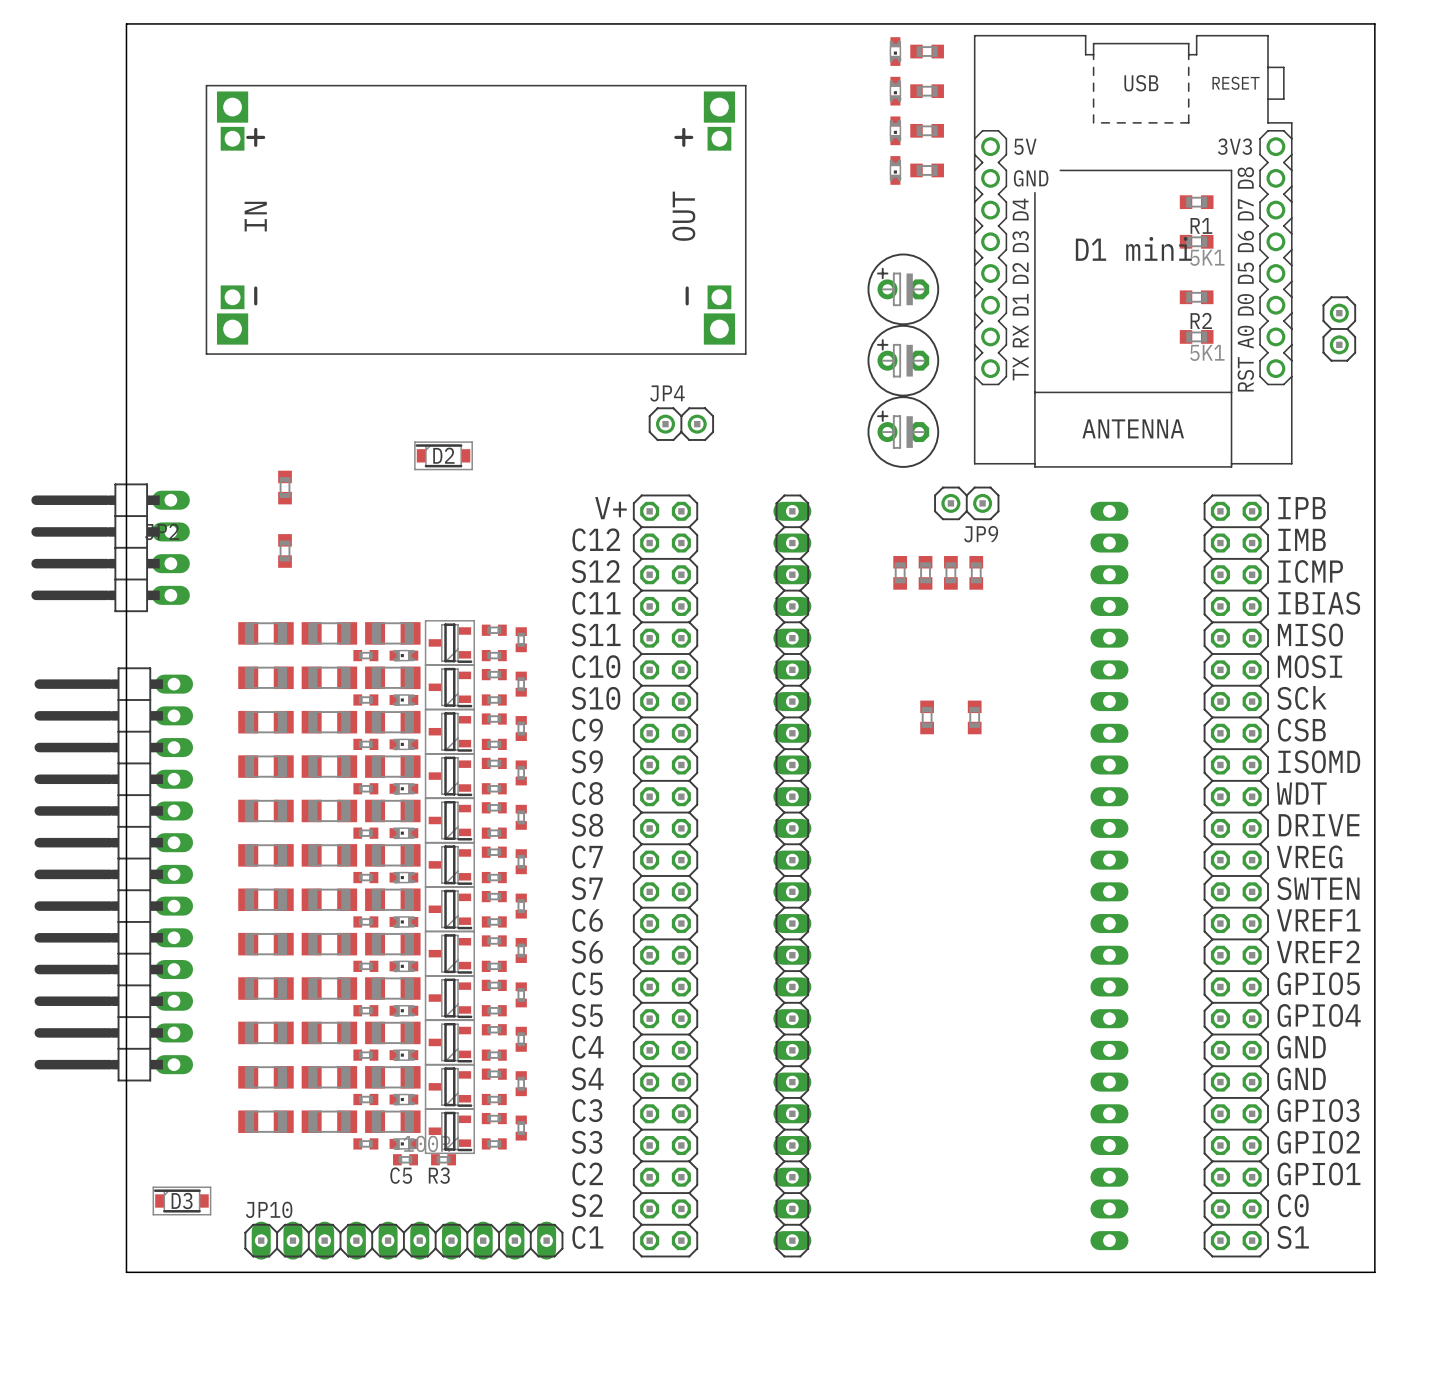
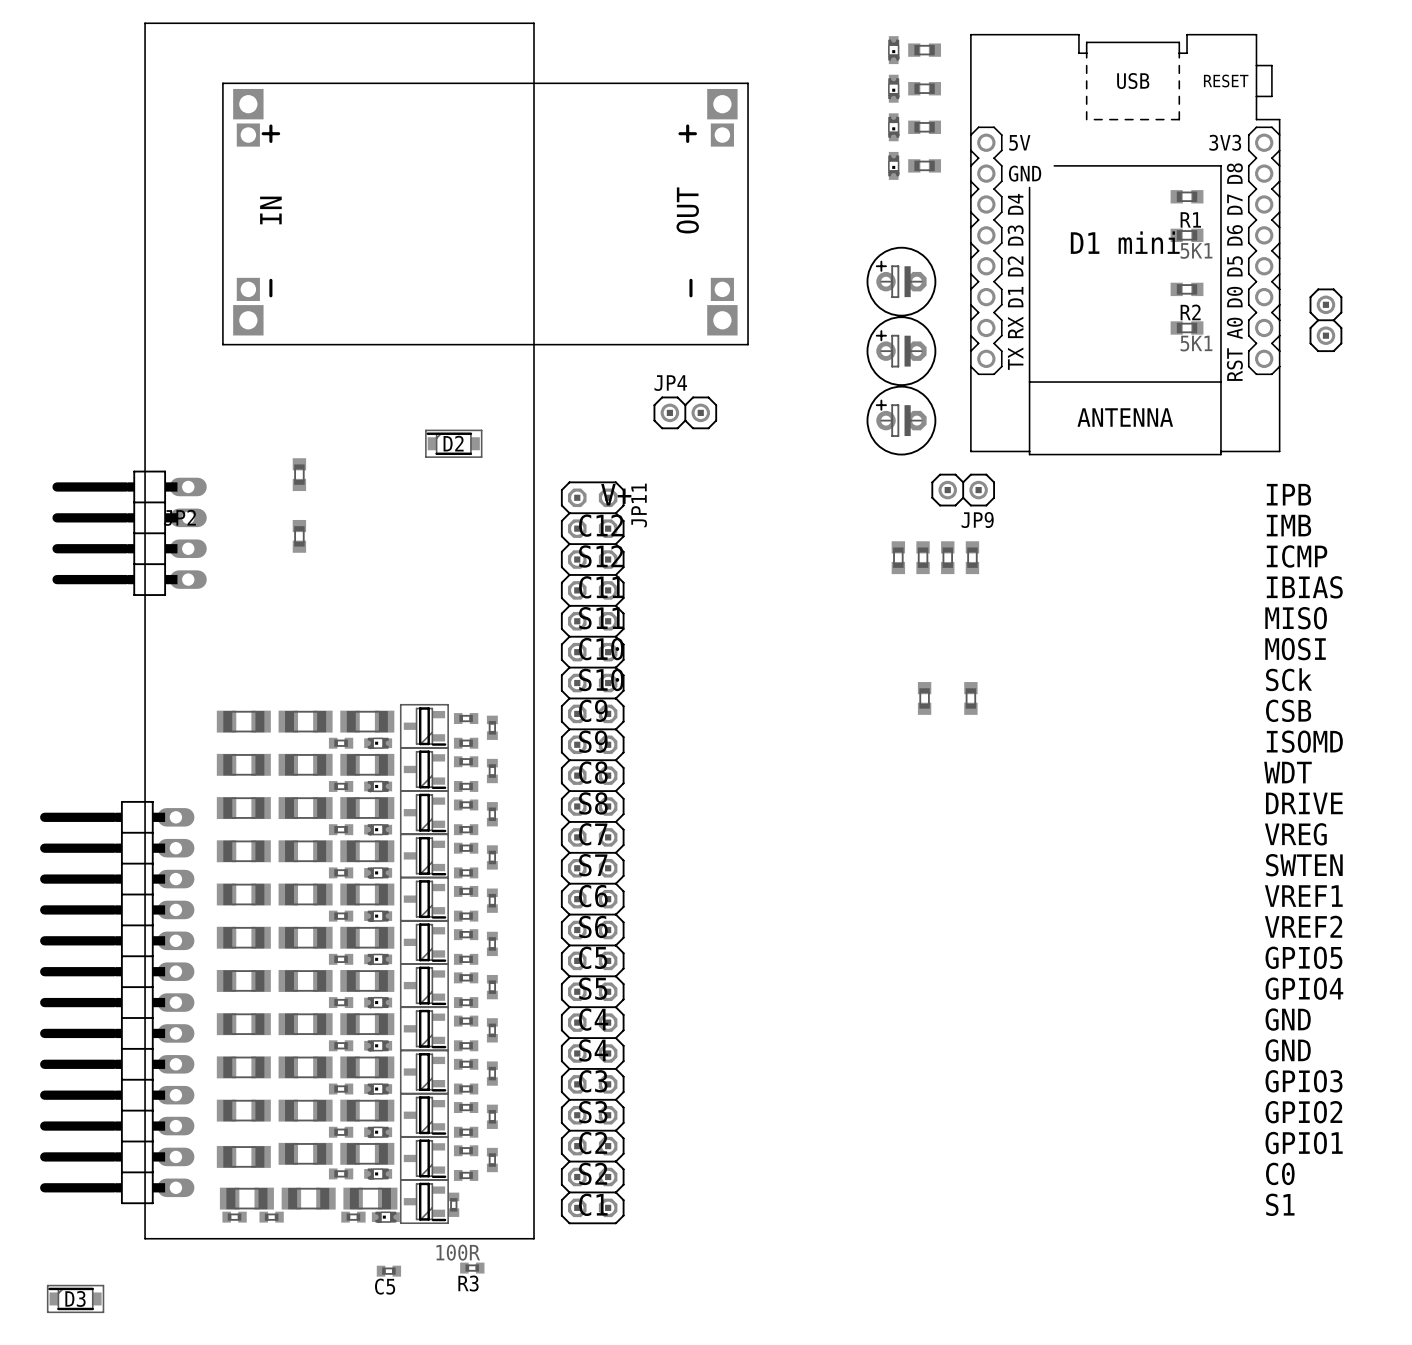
board edge: (525, 23) (1374, 23) (1374, 1272) (525, 1272) -> (534, 23) (534, 1238)
part: (494, 630) -> none
part: (265, 633) -> none
part: (329, 633) -> none
part: (392, 633) -> none
part: (521, 639) -> none
part: (449, 642) -> none
part: (365, 655) -> none
part: (403, 655) -> none
part: (494, 655) -> none
part: (494, 674) -> none
part: (265, 677) -> none
part: (329, 677) -> none
part: (392, 677) -> none
part: (521, 684) -> none
part: (449, 687) -> none
part: (365, 699) -> none
part: (403, 699) -> none
part: (494, 699) -> none
part footprint: [425, 709, 475, 755] -> [453, 713, 479, 725]
part: (494, 719) -> none
part: (265, 722) -> none
part: (329, 722) -> none
part: (392, 722) -> none
part: (521, 728) -> none
part footprint: [389, 738, 419, 751] -> [400, 704, 449, 749]
part: none -> (243, 721)
part: none -> (305, 721)
part: none -> (367, 721)
part: (365, 744) -> none
part: (494, 744) -> none
part: none -> (492, 727)
part footprint: [301, 755, 358, 778] -> [328, 737, 354, 749]
part: none -> (378, 743)
part: none -> (466, 743)
part: (494, 763) -> none
part: (265, 766) -> none
part: (392, 766) -> none
part: (521, 772) -> none
part: (449, 776) -> none
part: none -> (466, 761)
part footprint: [389, 783, 419, 795] -> [400, 747, 449, 792]
part: none -> (243, 764)
part: none -> (305, 764)
part: none -> (367, 764)
part: (365, 788) -> none
part: (494, 788) -> none
part: none -> (492, 771)
part footprint: [301, 799, 358, 823] -> [328, 780, 354, 792]
part: none -> (378, 786)
part: none -> (466, 786)
part: (494, 807) -> none
part: (265, 810) -> none
part: (392, 810) -> none
part: (521, 817) -> none
part: (449, 820) -> none
part: none -> (466, 804)
part footprint: [389, 827, 419, 839] -> [400, 790, 449, 835]
part: none -> (243, 808)
part: none -> (305, 808)
part: none -> (367, 808)
part: (365, 833) -> none
part: (494, 833) -> none
part: none -> (492, 814)
part footprint: [301, 844, 358, 867] -> [328, 824, 354, 836]
part: none -> (378, 829)
part: none -> (466, 829)
part: (494, 852) -> none
part: (265, 855) -> none
part: (392, 855) -> none
part: (521, 861) -> none
part: (449, 864) -> none
part footprint: [389, 871, 419, 884] -> [400, 834, 449, 878]
part: none -> (466, 848)
part position: (113, 874) -> (117, 1002)
part: none -> (243, 851)
part: none -> (305, 851)
part: none -> (367, 851)
JP11: none -> (592, 852)
part: (665, 875) -> none
part: (792, 875) -> none
part: (1109, 875) -> none
part: (1236, 875) -> none
part: (365, 877) -> none
part: (494, 877) -> none
part: none -> (492, 857)
part footprint: [301, 888, 358, 912] -> [328, 867, 354, 879]
part: none -> (378, 872)
part: none -> (466, 872)
part: (494, 896) -> none
part: (265, 899) -> none
part: (392, 899) -> none
part: (521, 906) -> none
part: (449, 909) -> none
part: none -> (466, 891)
part footprint: [389, 916, 419, 928] -> [400, 877, 449, 921]
part: none -> (243, 894)
part: none -> (305, 894)
part: none -> (367, 894)
part: (365, 921) -> none
part: (494, 921) -> none
part: none -> (492, 900)
part footprint: [301, 932, 358, 956] -> [328, 910, 354, 922]
part: none -> (378, 916)
part: none -> (466, 916)
part: (494, 940) -> none
part: (265, 944) -> none
part: (392, 944) -> none
part: (521, 950) -> none
part: (449, 953) -> none
part footprint: [389, 960, 419, 972] -> [400, 920, 449, 965]
part: none -> (466, 934)
part: none -> (243, 937)
part: none -> (305, 937)
part: none -> (367, 937)
part: (365, 966) -> none
part: (494, 966) -> none
part: none -> (492, 943)
part footprint: [301, 977, 358, 1000] -> [328, 953, 354, 965]
part: none -> (378, 959)
part: none -> (466, 959)
part: (494, 985) -> none
part: (265, 988) -> none
part: (392, 988) -> none
part: (521, 994) -> none
part: (449, 998) -> none
part: none -> (466, 977)
part footprint: [389, 1005, 419, 1017] -> [400, 963, 449, 1008]
part: none -> (243, 980)
part: none -> (305, 980)
part: none -> (367, 980)
part: (365, 1010) -> none
part: (494, 1010) -> none
part: none -> (492, 987)
part footprint: [301, 1021, 358, 1045] -> [328, 997, 354, 1009]
part: none -> (378, 1002)
part: none -> (466, 1002)
part: (494, 1029) -> none
part: (265, 1032) -> none
part: (392, 1032) -> none
part: (521, 1039) -> none
part: (449, 1042) -> none
part: none -> (466, 1021)
part footprint: [389, 1049, 419, 1061] -> [400, 1006, 449, 1051]
part: none -> (243, 1024)
part: none -> (305, 1024)
part: none -> (367, 1024)
part: (365, 1055) -> none
part: (494, 1055) -> none
part: none -> (492, 1030)
part footprint: [301, 1066, 358, 1089] -> [328, 1040, 354, 1052]
part: none -> (378, 1045)
part: none -> (466, 1045)
part: (494, 1074) -> none
part: (265, 1077) -> none
part: (392, 1077) -> none
part: (521, 1083) -> none
part: (449, 1086) -> none
part footprint: [389, 1093, 419, 1106] -> [400, 1050, 449, 1094]
part: none -> (466, 1064)
part: none -> (243, 1067)
part: none -> (305, 1067)
part: none -> (367, 1067)
part: (365, 1099) -> none
part: (494, 1099) -> none
part: none -> (492, 1073)
part footprint: [301, 1110, 358, 1133] -> [328, 1083, 354, 1095]
part: none -> (378, 1089)
part: none -> (466, 1089)
part: (494, 1118) -> none
part: (265, 1121) -> none
part: (392, 1121) -> none
part: (521, 1128) -> none
part: (449, 1131) -> none
part: none -> (466, 1107)
part footprint: [389, 1138, 419, 1150] -> [400, 1093, 449, 1138]
part: none -> (243, 1110)
part: none -> (305, 1110)
part: none -> (367, 1110)
part: (365, 1143) -> none
part rotation: 0° (494, 1143) -> 90° clockwise (492, 1116)
C5 position: (405, 1159) -> (388, 1271)
R3 position: (443, 1159) -> (472, 1268)
part: none -> (341, 1132)
part: none -> (378, 1132)
part: none -> (466, 1132)
part: none -> (466, 1150)
part: none -> (305, 1153)
part: none -> (367, 1153)
part: none -> (243, 1156)
part: none -> (424, 1158)
part: none -> (492, 1160)
D3 position: (181, 1200) -> (75, 1298)
part: none -> (341, 1173)
part: none -> (378, 1173)
part: none -> (466, 1175)
part: none -> (246, 1198)
part: none -> (308, 1198)
part: none -> (370, 1198)
part: none -> (424, 1201)
part: none -> (453, 1204)
JP10: (403, 1240) -> none
part: none -> (234, 1217)
part: none -> (271, 1217)
part: none -> (353, 1217)
part: none -> (385, 1217)

